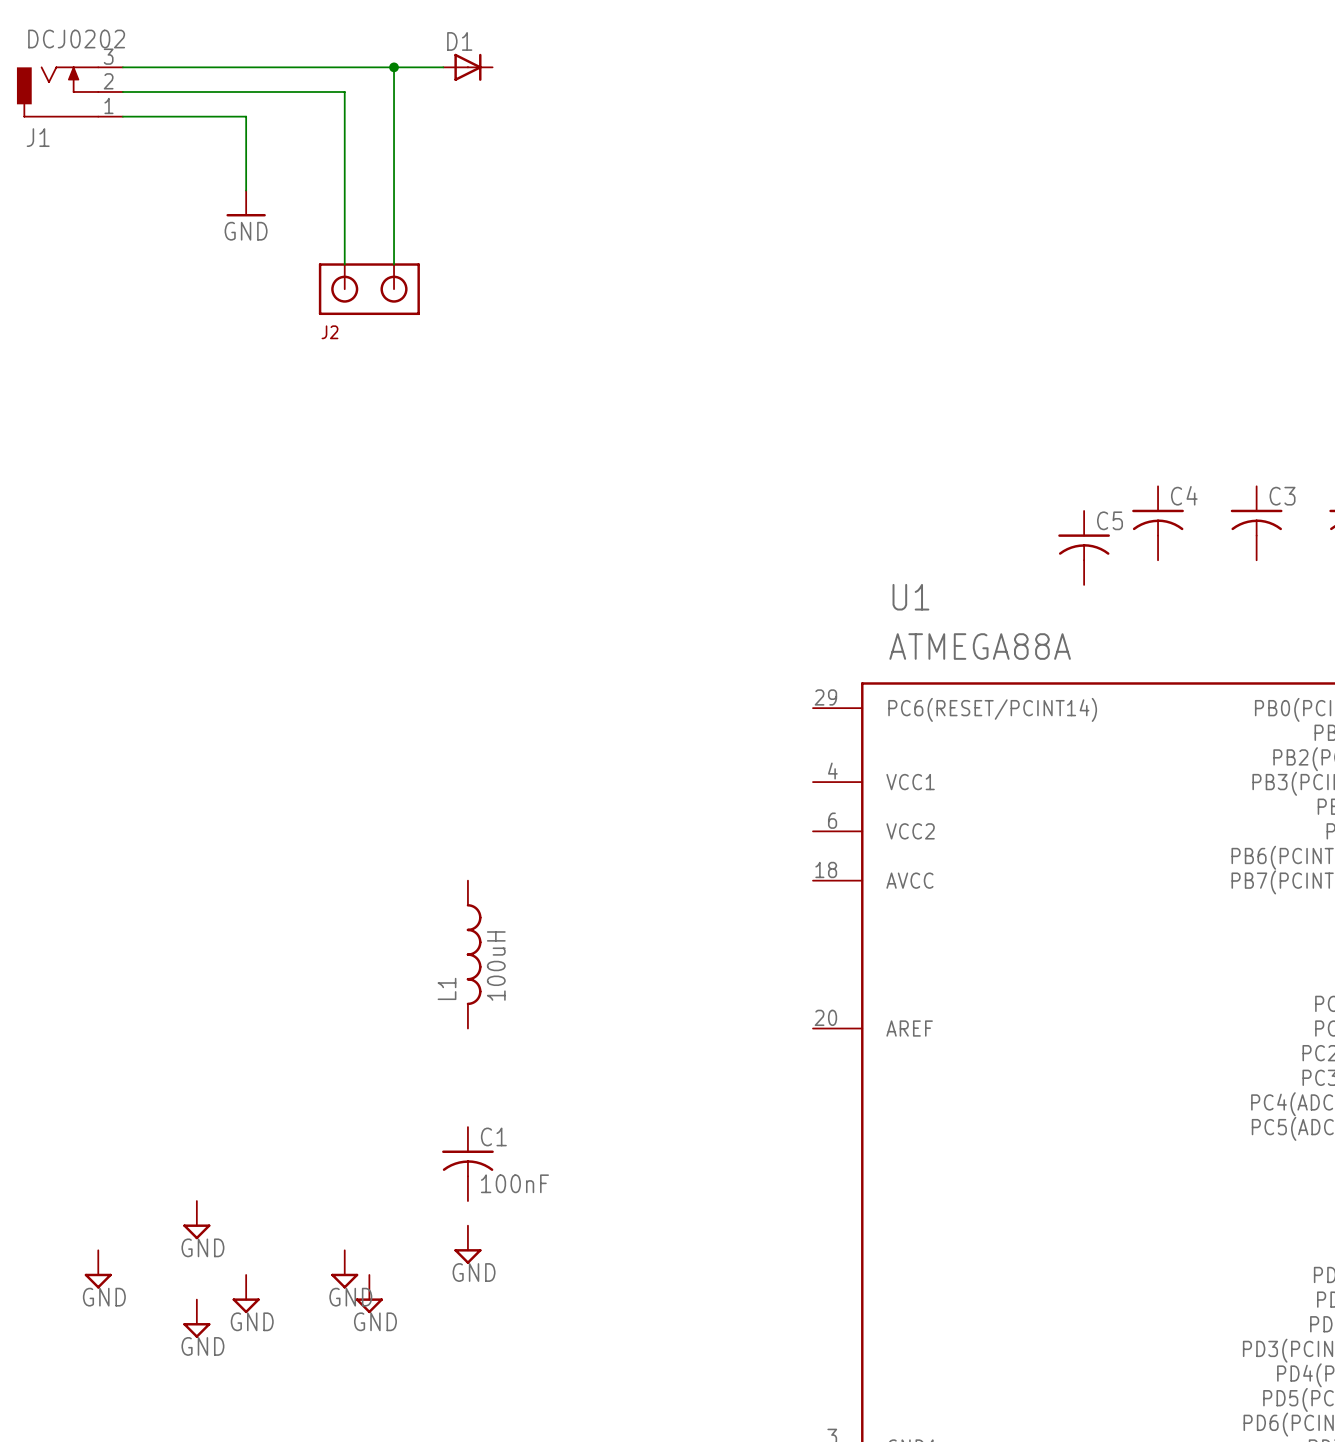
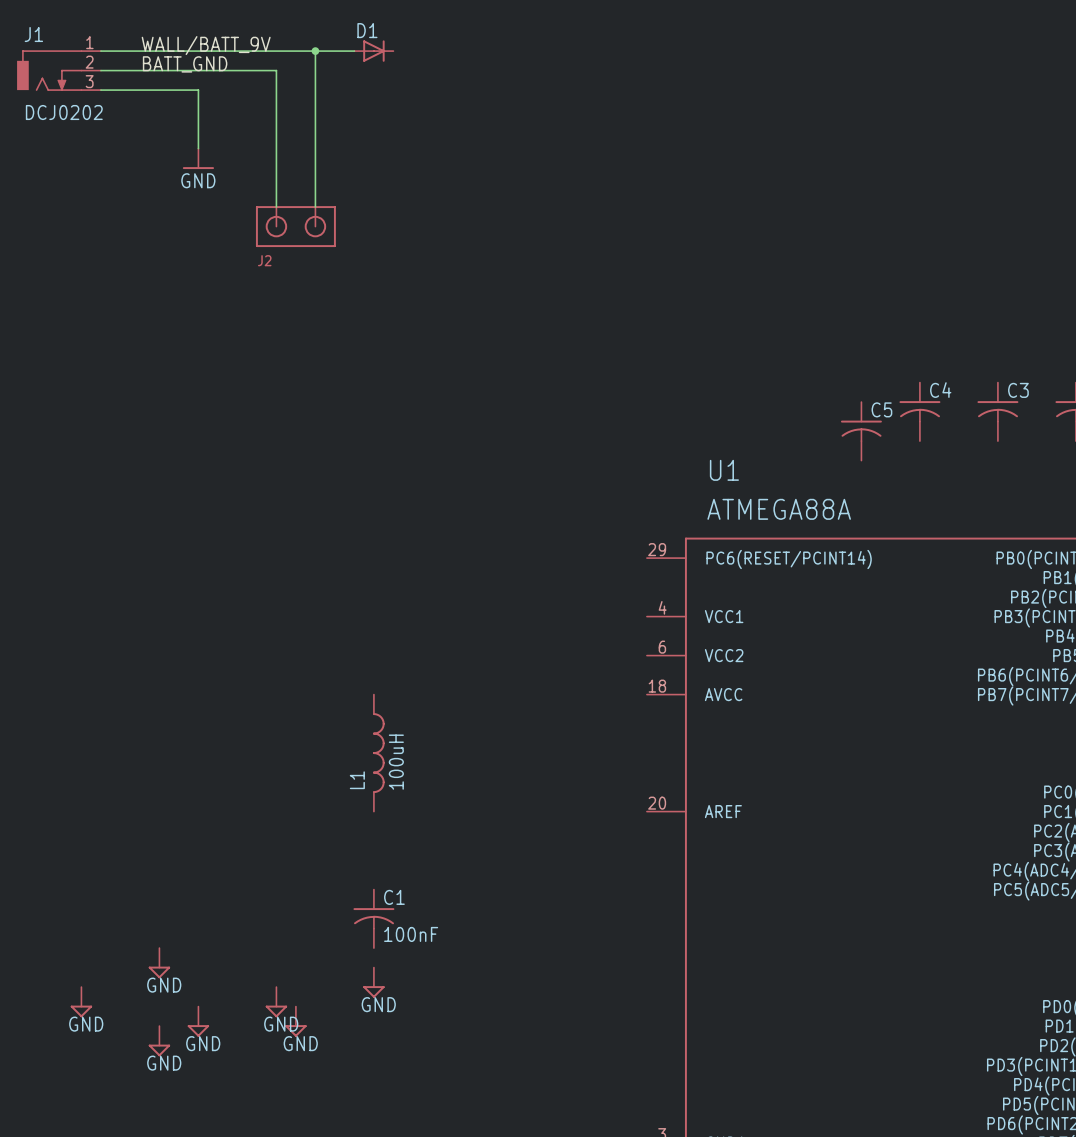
label: none -> WALL/BATT_9V (206, 45)
label: none -> BATT_GND (185, 64)
J1 flip: as is (57, 91) -> up-down (49, 70)

